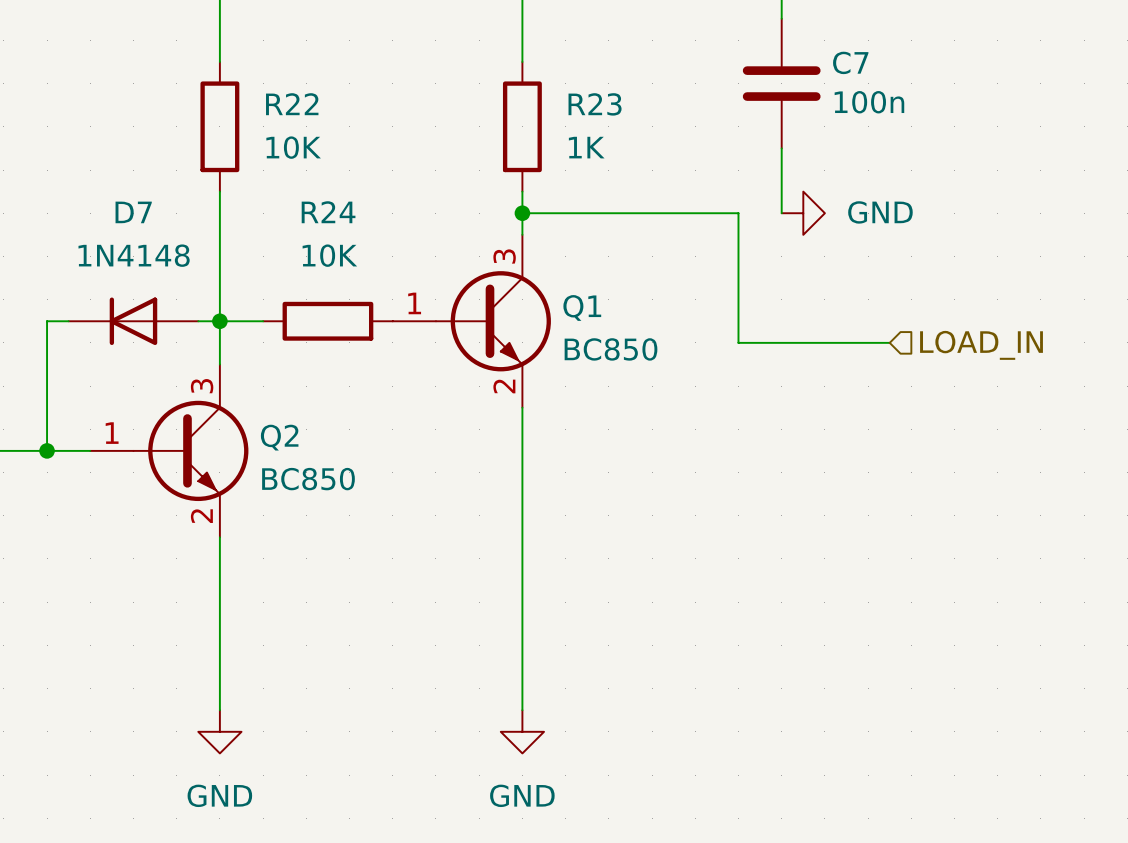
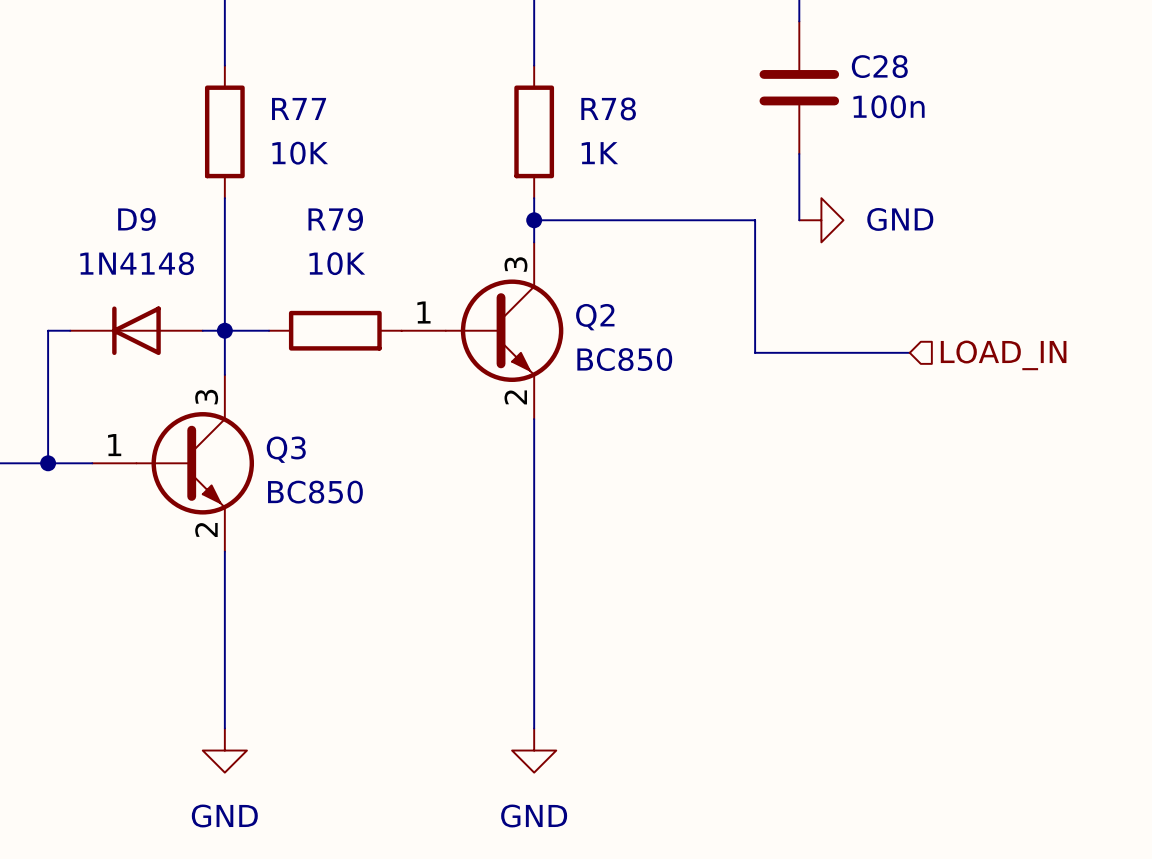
C7 name: C7 (850, 62) -> C28 (879, 66)
R22 name: R22 (292, 104) -> R77 (299, 108)
R23 name: R23 (595, 104) -> R78 (608, 108)
D7 name: D7 (133, 212) -> D9 (136, 219)
R24 name: R24 (328, 212) -> R79 (335, 219)
Q1 name: Q1 (582, 307) -> Q2 (595, 317)
Q2 name: Q2 (279, 437) -> Q3 (286, 449)

